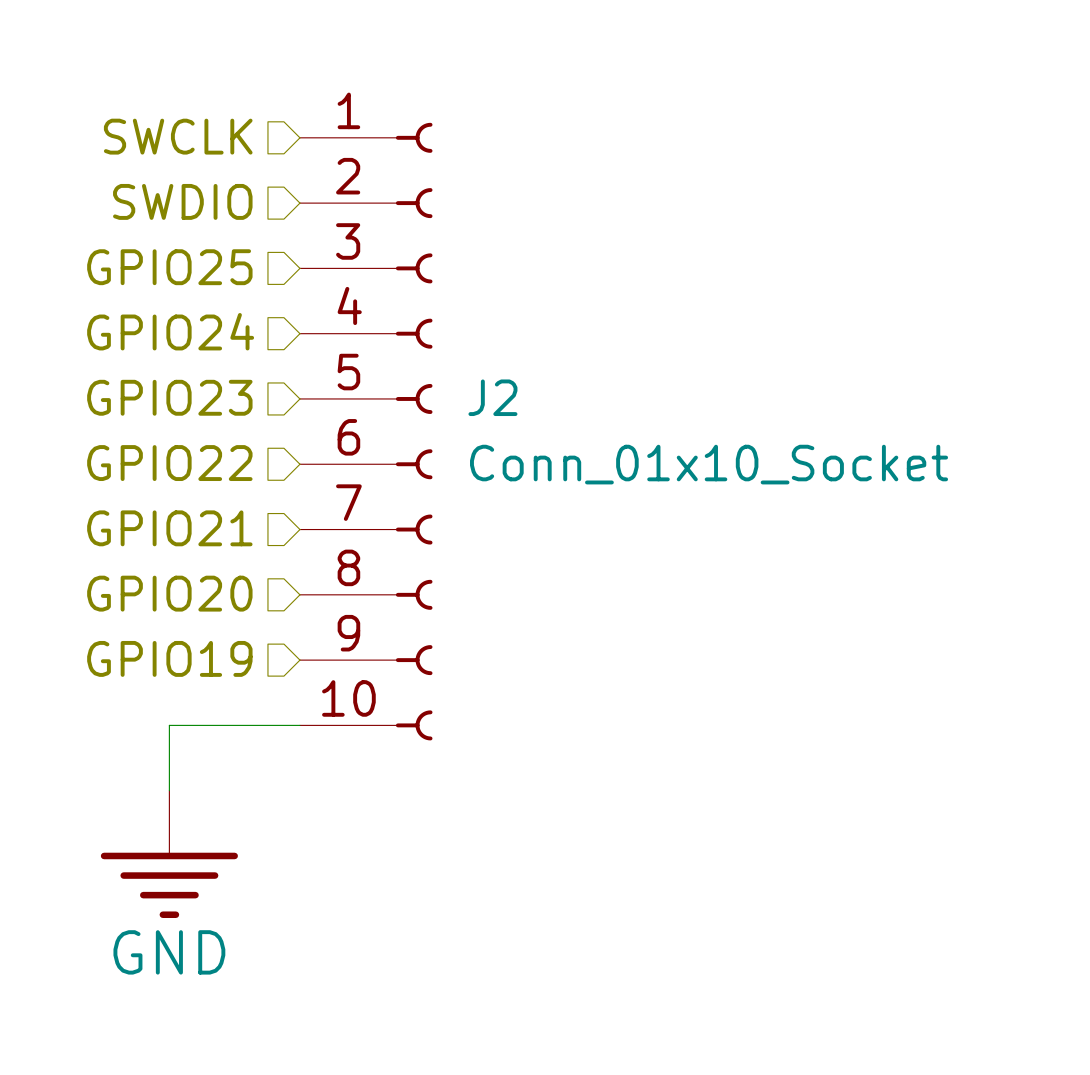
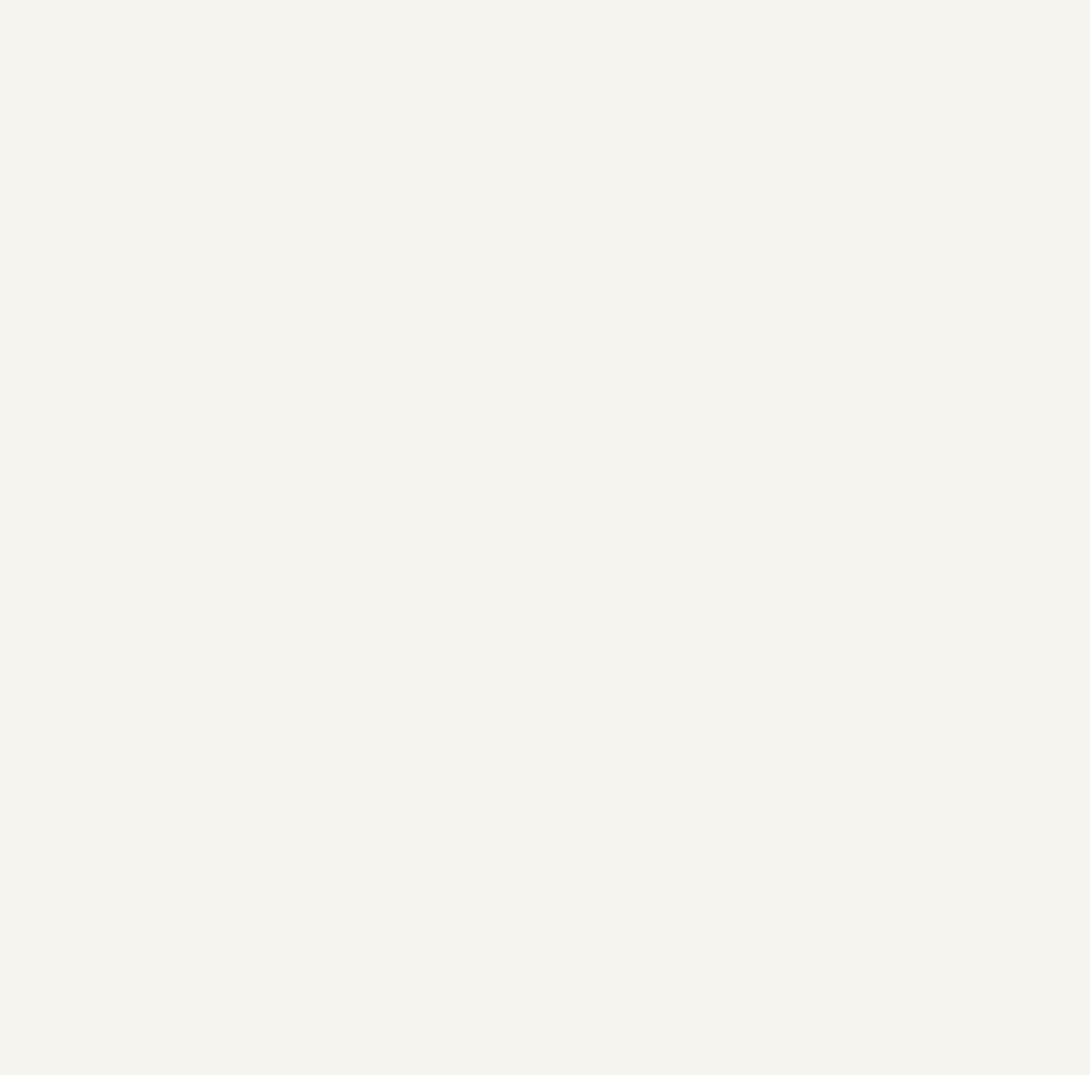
hierarchical label: SWCLK (178, 136) -> none
hierarchical label: SWDIO (182, 201) -> none
hierarchical label: GPIO25 (169, 267) -> none
hierarchical label: GPIO24 (170, 331) -> none
hierarchical label: GPIO23 (169, 397) -> none
J2: Conn_01x10_Socket (366, 431) -> none
hierarchical label: GPIO22 (169, 463) -> none
hierarchical label: GPIO21 (169, 528) -> none
hierarchical label: GPIO20 (169, 593) -> none
hierarchical label: GPIO19 (169, 658) -> none
wire: (299, 725) (169, 725) (169, 790) -> none
power symbol: GND (169, 854) -> none

